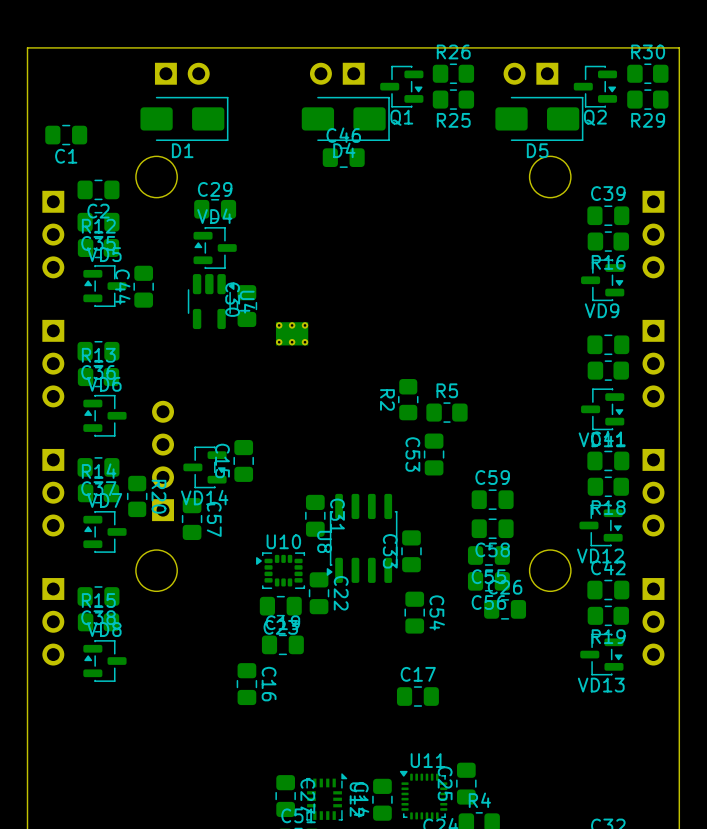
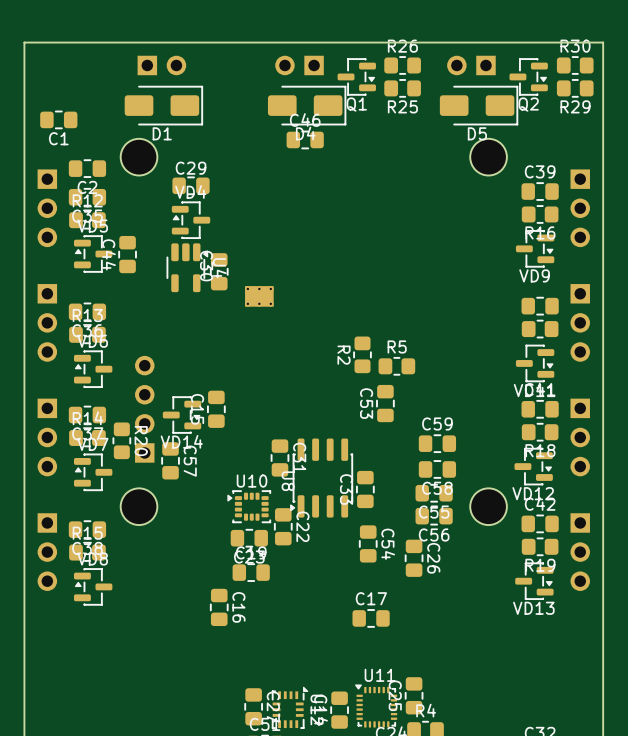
C26 rotation: 0° (505, 609) -> 90° clockwise (414, 558)
C26 position: (505, 609) -> (414, 558)

